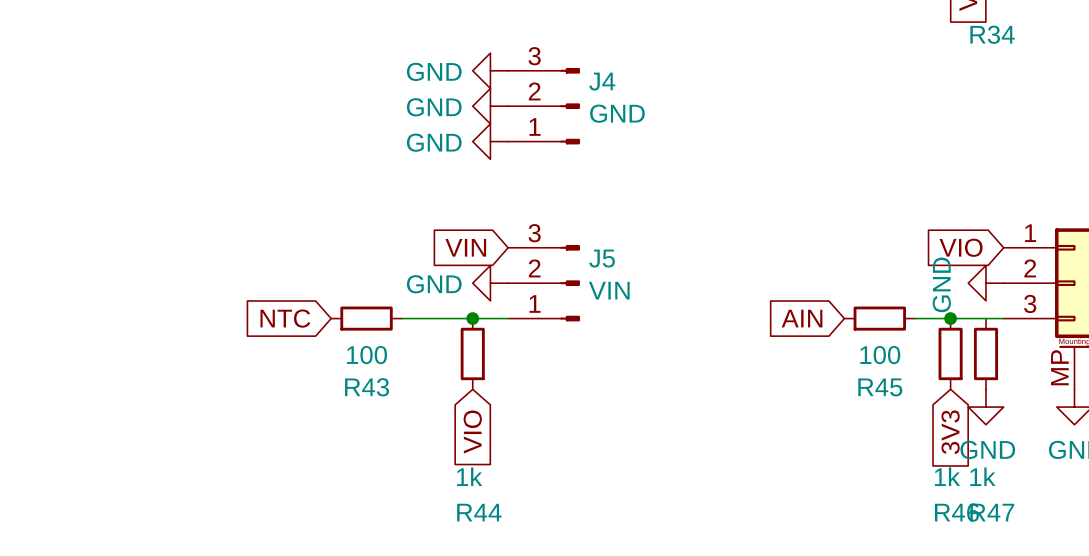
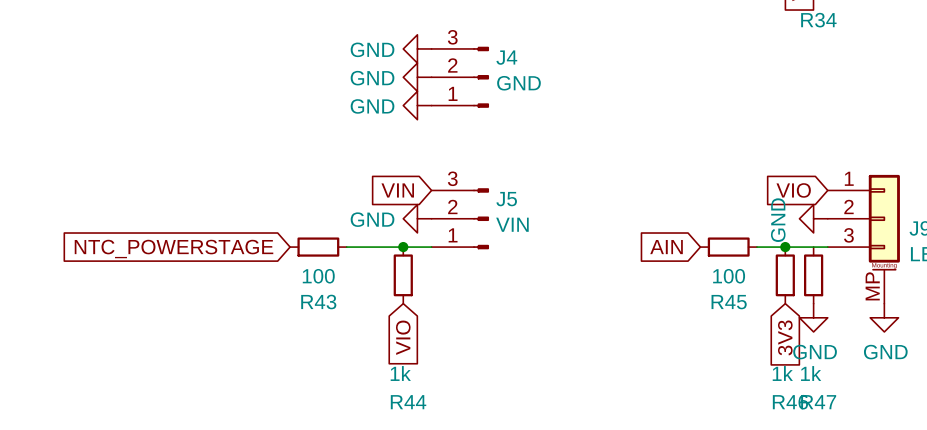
global label: NTC (285, 318) -> NTC_POWERSTAGE (174, 249)

